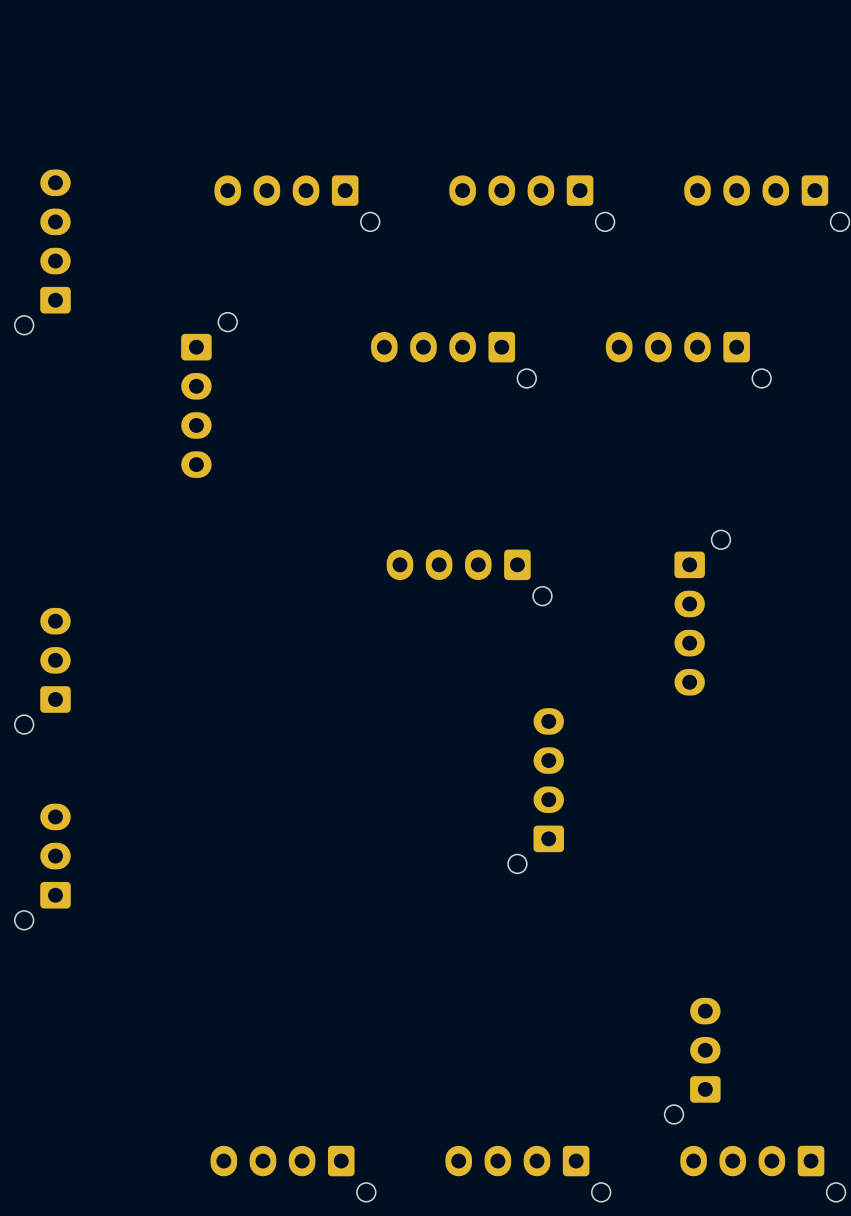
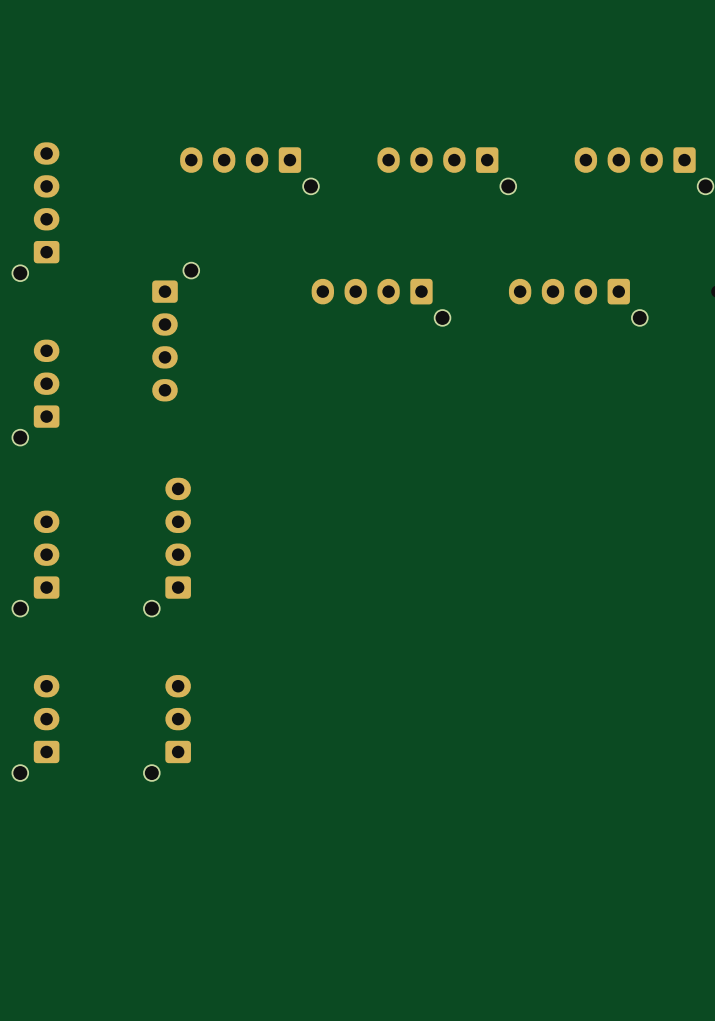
part: none -> (35, 392)
part: (469, 577) -> none
part: (702, 612) -> none
part: none -> (167, 547)
part: (536, 790) -> none
part: none -> (167, 727)
part: (692, 1060) -> none
part: (293, 1173) -> none
part: (527, 1173) -> none
part: (762, 1173) -> none

